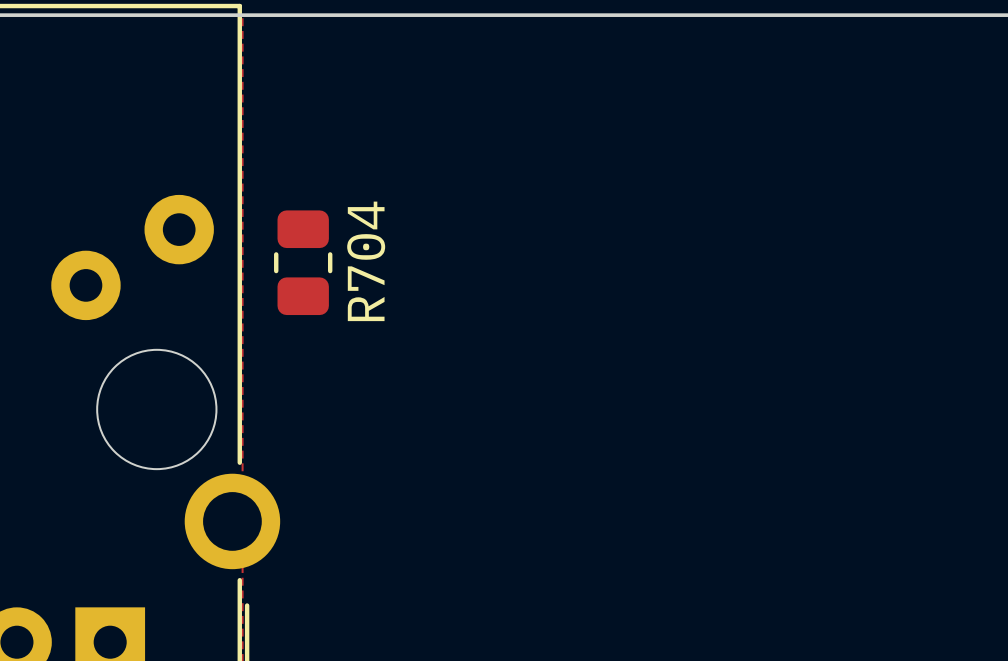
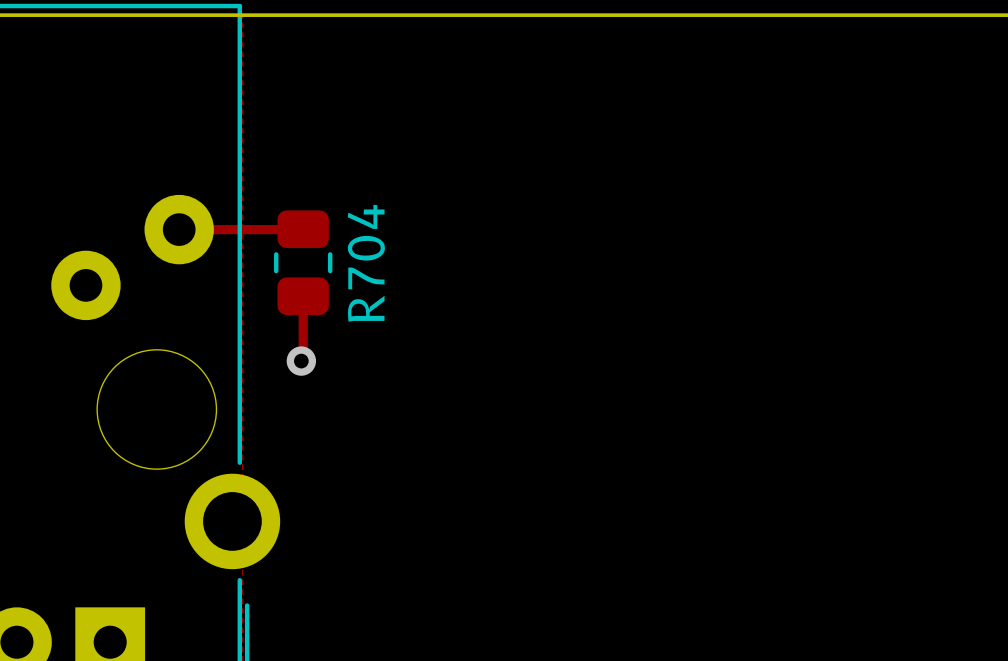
track: none -> (179, 229) (302, 229)
track: none -> (303, 296) (303, 359) (301, 361)
via: none -> (301, 361)

